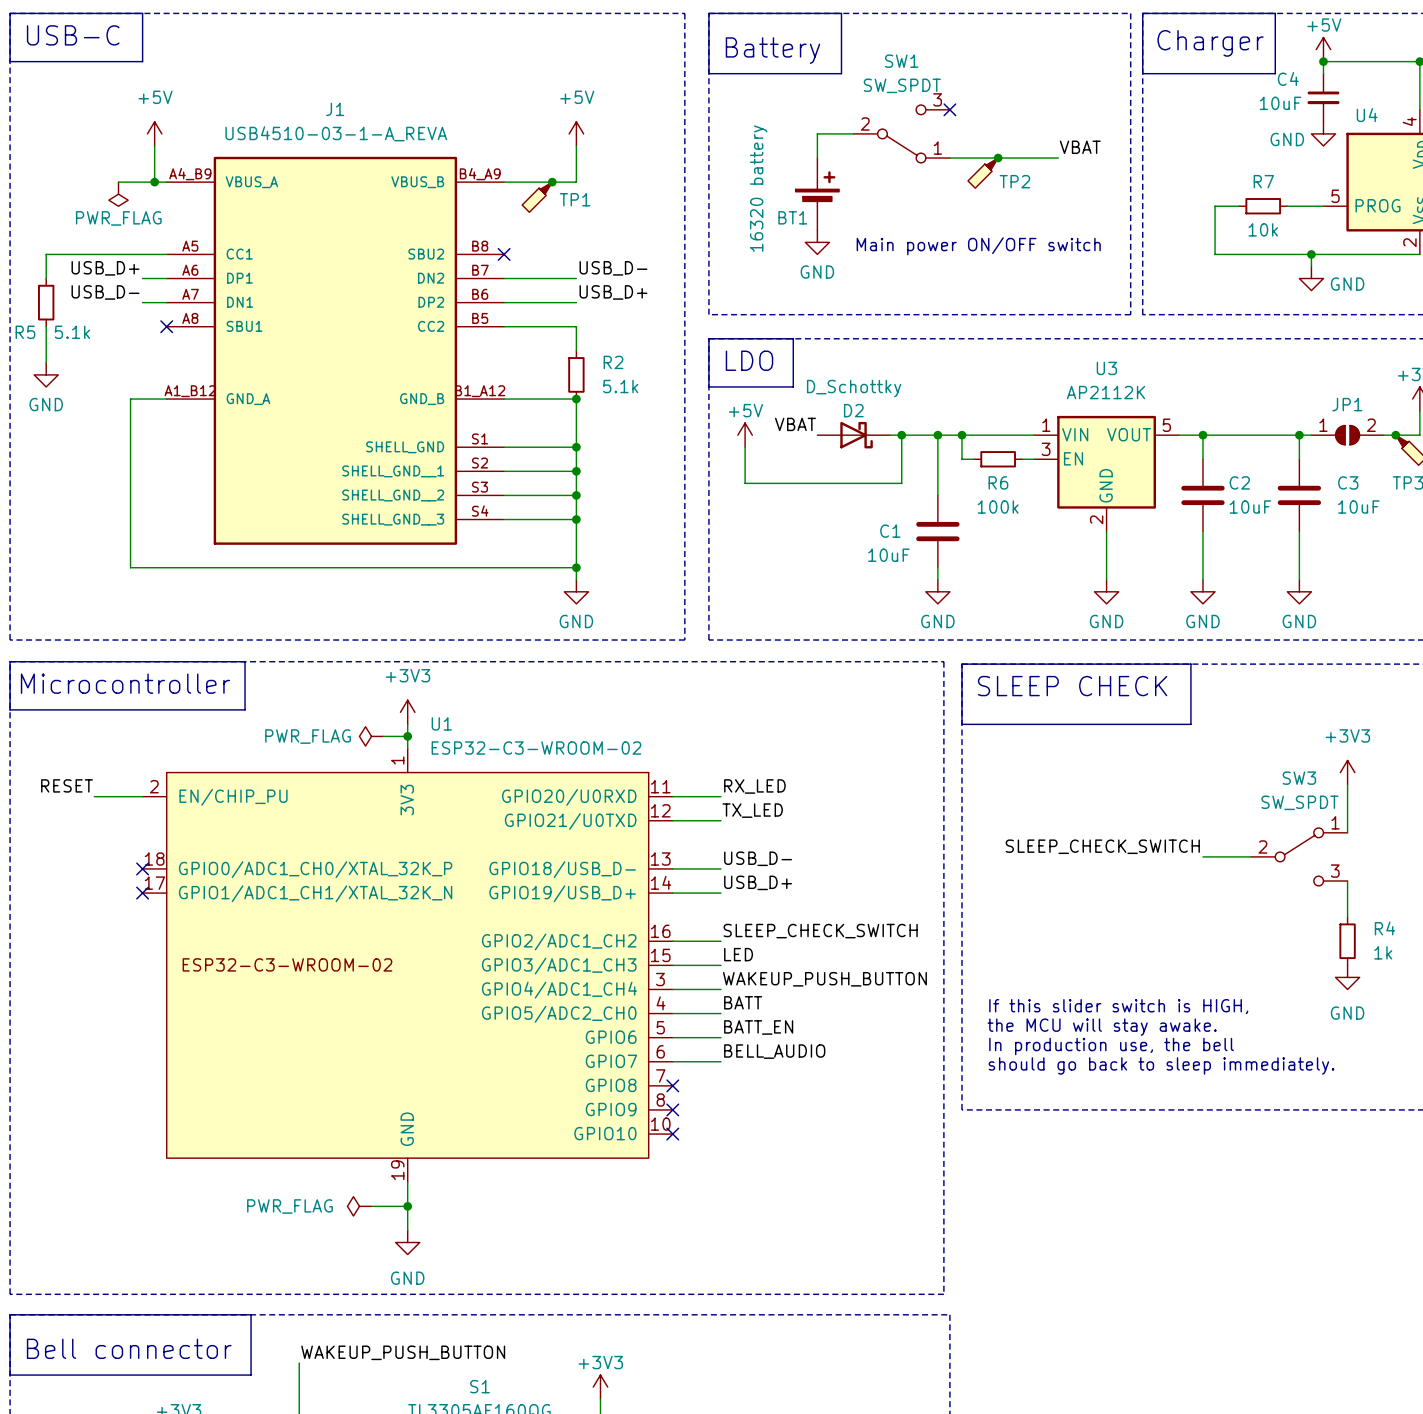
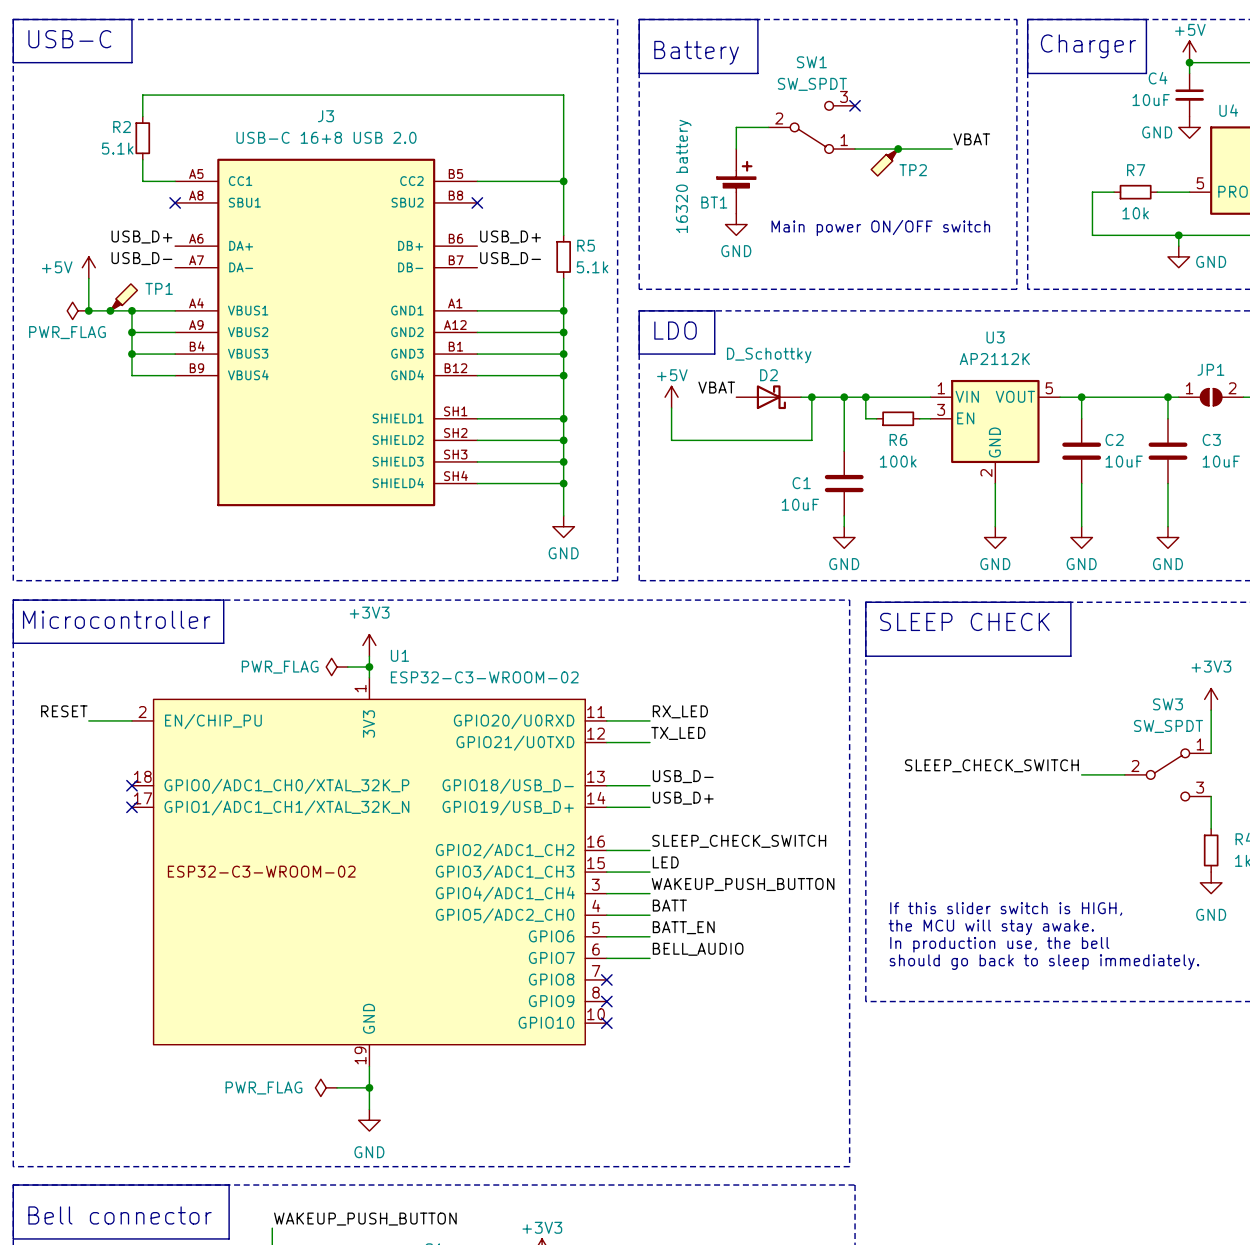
power symbol text position: +5V (155, 97) -> +5V (57, 267)
wire: none -> (142, 116) (142, 95) (563, 95) (563, 235)
power symbol position: +5V (154, 133) -> +5V (88, 267)
power symbol: +5V (576, 133) -> none
wire: (154, 145) (154, 170) -> none
wire: (576, 145) (576, 182) (504, 182) -> none
wire: (118, 182) (166, 182) -> (131, 332) (175, 332)
wire: none -> (142, 170) (142, 181) (175, 181)
junction: (154, 182) -> none
junction: (552, 182) -> none
power symbol rotation: 0° (118, 194) -> 90° clockwise (78, 310)
power symbol position: PWR_FLAG (118, 194) -> PWR_FLAG (78, 310)
wire: none -> (477, 181) (563, 181)
junction: none -> (563, 181)
TP1 rotation: 0° (537, 197) -> 180° (123, 297)
TP1 position: (537, 197) -> (123, 297)
no-connect mark: none -> (175, 202)
wire: (166, 254) (46, 254) (46, 278) -> none
no-connect mark position: (504, 254) -> (477, 202)
label position: USB_D+ (105, 268) -> USB_D+ (141, 237)
label position: USB_D- (613, 268) -> USB_D- (510, 258)
wire: (142, 278) (166, 278) -> none
wire: (504, 278) (576, 278) -> none
label position: USB_D- (105, 292) -> USB_D- (141, 258)
label position: USB_D+ (613, 292) -> USB_D+ (510, 237)
R5 position: (46, 302) -> (563, 256)
wire: none -> (88, 278) (88, 310) (175, 310)
wire: (142, 302) (166, 302) -> none
wire: (504, 302) (576, 302) -> none
wire: none -> (563, 278) (563, 515)
wire: (46, 326) (46, 362) -> none
no-connect mark: (166, 326) -> none
wire: (504, 326) (576, 326) (576, 350) -> none
R5 name position: R5 (25, 332) -> R5 (586, 245)
R5 value position: 5.1k (72, 332) -> 5.1k (592, 267)
junction: none -> (88, 310)
junction: none -> (110, 310)
wire: none -> (131, 310) (131, 375) (175, 375)
junction: none -> (131, 310)
wire: none -> (477, 310) (563, 310)
junction: none -> (563, 310)
J1: USB4510-03-1-A_REVA (335, 350) -> none
junction: none -> (131, 332)
J3: none -> USB-C 16+8 USB 2.0 (326, 332)
wire: none -> (477, 332) (563, 332)
R2 name position: R2 (613, 362) -> R2 (122, 127)
junction: none -> (563, 332)
power symbol: GND (46, 374) -> none
R2 position: (576, 374) -> (142, 138)
wire: none -> (131, 354) (175, 354)
junction: none -> (131, 354)
wire: none -> (477, 354) (563, 354)
R2 value position: 5.1k (620, 386) -> 5.1k (117, 148)
junction: none -> (563, 354)
wire: (166, 399) (130, 399) (130, 567) (576, 567) -> none
wire: (504, 399) (576, 399) (576, 579) -> none
junction: (576, 399) -> none
wire: none -> (477, 375) (563, 375)
junction: none -> (563, 375)
wire: (504, 447) (576, 447) -> none
junction: (576, 447) -> none
wire: none -> (477, 418) (563, 418)
junction: none -> (563, 418)
wire: (504, 471) (576, 471) -> none
junction: (576, 471) -> none
wire: none -> (477, 440) (563, 440)
junction: none -> (563, 440)
wire: (504, 495) (576, 495) -> none
junction: (576, 495) -> none
wire: none -> (477, 461) (563, 461)
junction: none -> (563, 461)
wire: (504, 519) (576, 519) -> none
junction: (576, 519) -> none
wire: none -> (477, 483) (563, 483)
junction: none -> (563, 483)
junction: (576, 567) -> none
power symbol position: GND (576, 591) -> GND (563, 526)

